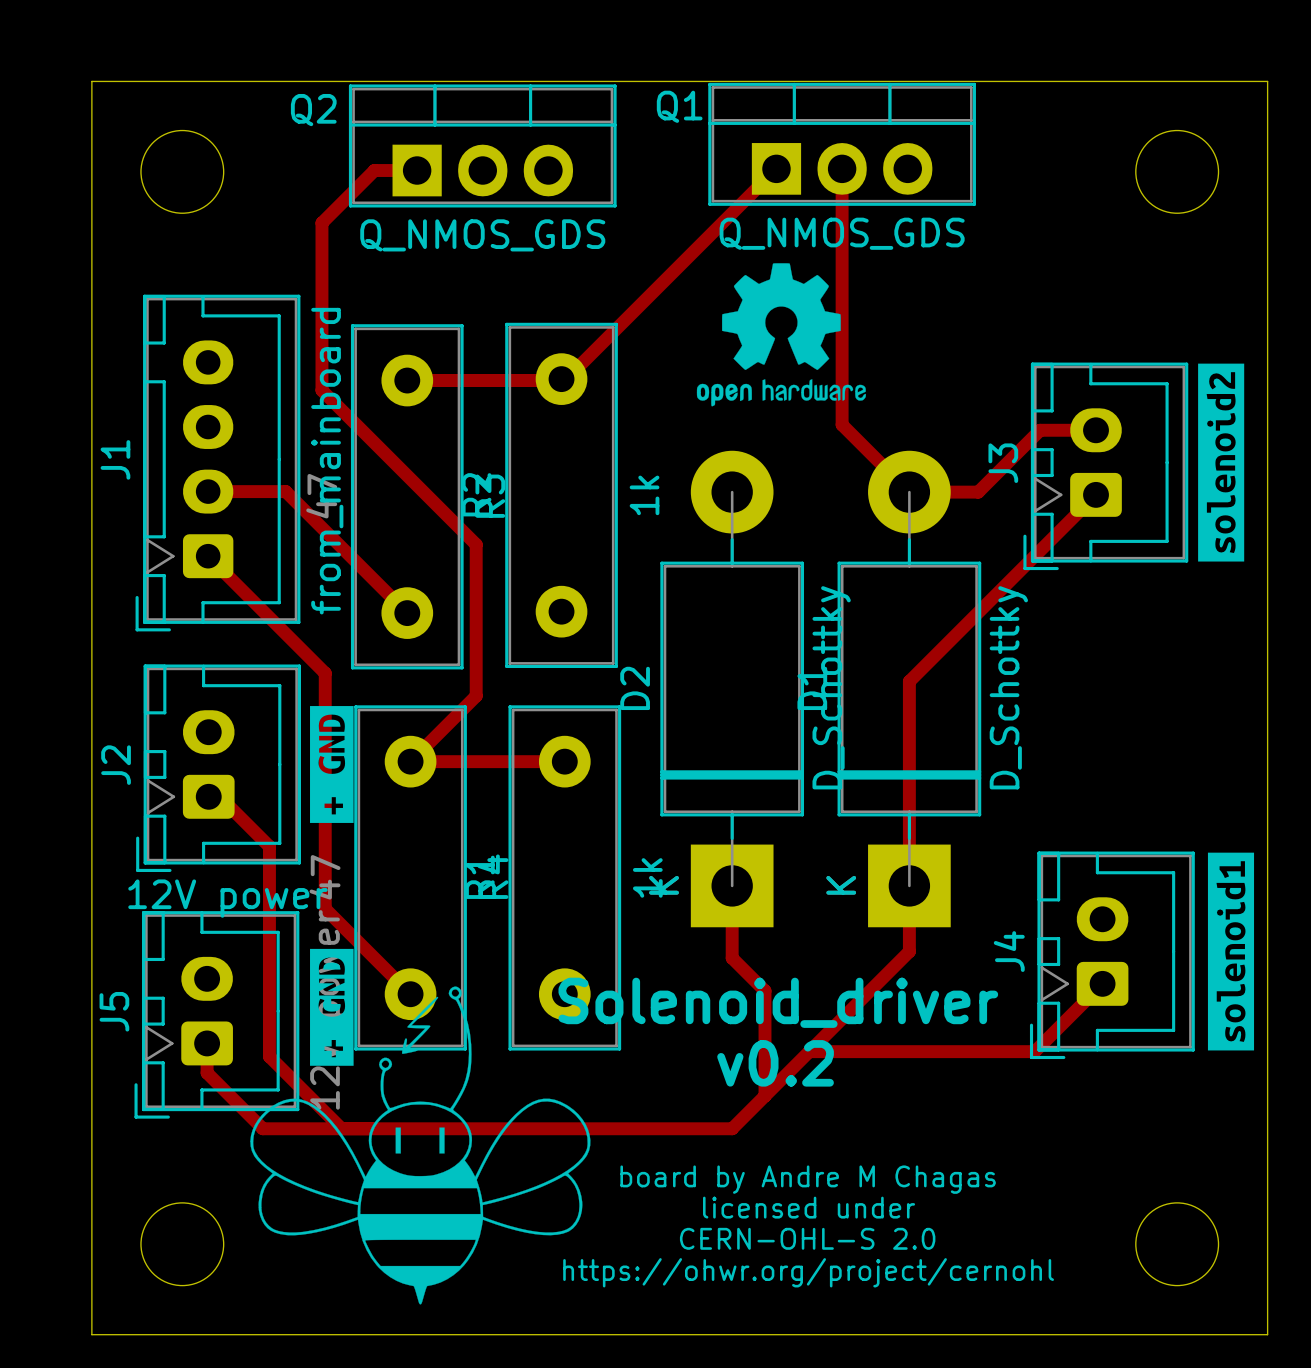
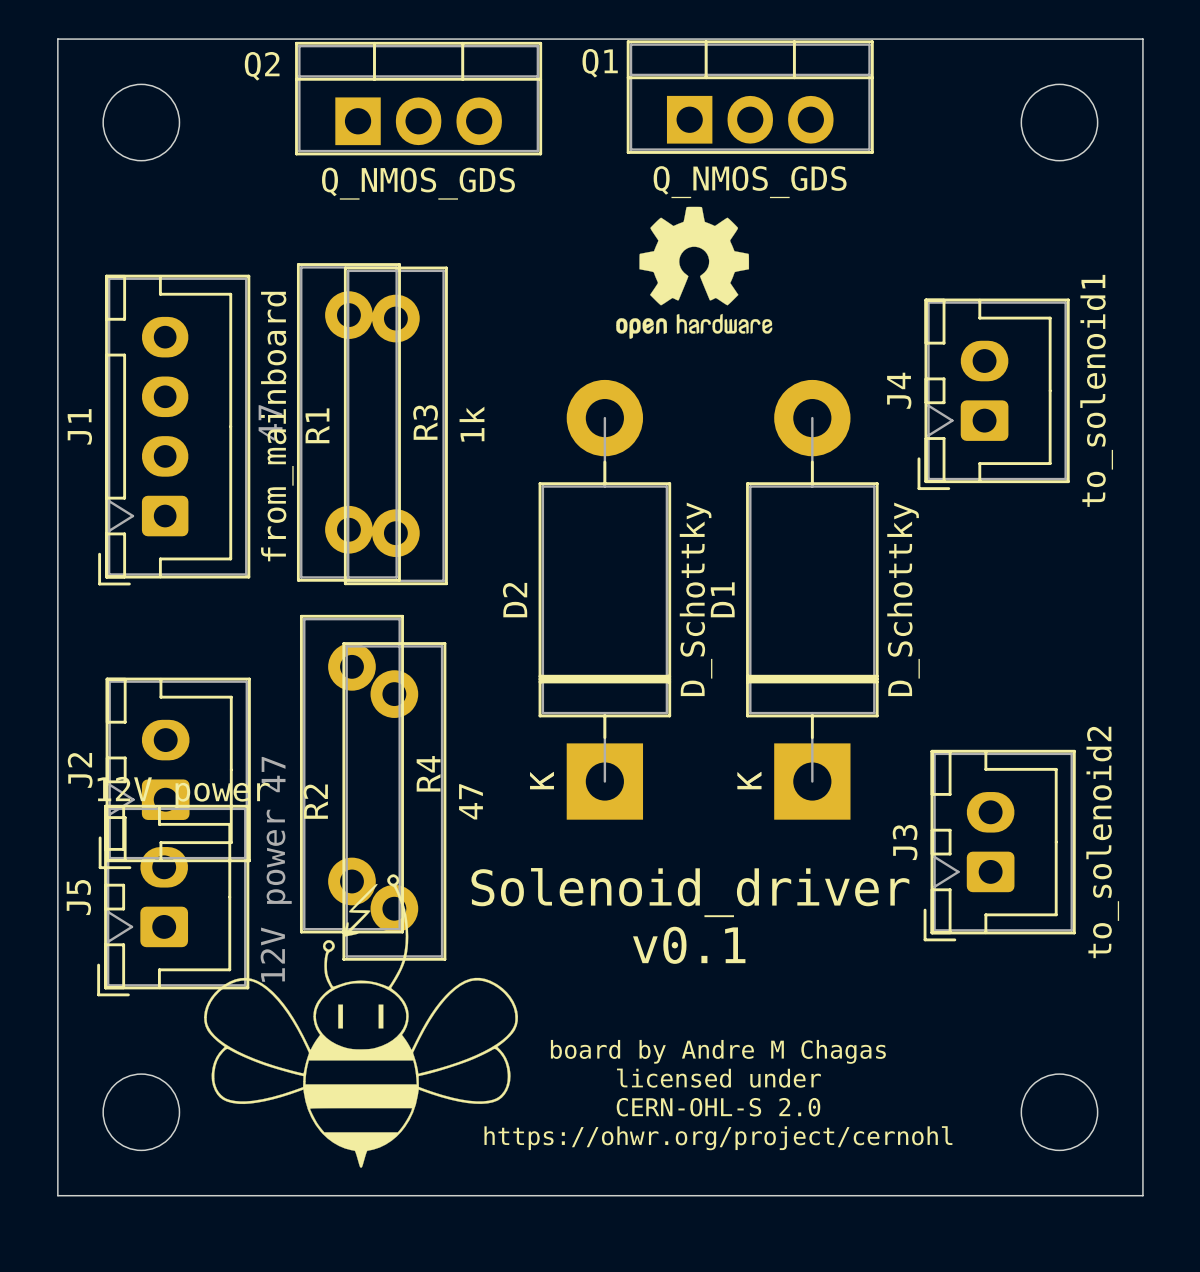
track: (776, 168) (564, 380) (407, 380) -> none
track: (842, 168) (842, 424) (909, 492) (978, 492) (1040, 430) (1096, 430) -> none
track: (417, 170) (374, 170) (321, 223) (321, 390) (476, 544) (476, 696) (410, 761) (564, 761) -> none
drawing: [1198, 363, 1245, 562] -> none
J1 position: (217, 463) -> (174, 430)
J3 name: J3 (1003, 463) -> J4 (899, 390)
J3 value: none -> to_solenoid1 (1096, 390)
track: (208, 491) (285, 491) (407, 613) -> none
track: (1096, 494) (909, 681) (909, 951) (732, 1128) (262, 1128) (207, 1072) (207, 1043) -> none
R2 position: (561, 495) -> (394, 801)
R2 value: 1k (644, 495) -> 47 (470, 801)
track: (208, 556) (325, 673) (325, 908) (410, 994) -> none
D2 position: (732, 689) -> (604, 599)
drawing: [310, 706, 354, 823] -> none
J2 position: (218, 768) -> (174, 773)
track: (208, 796) (219, 796) (269, 846) (269, 1056) (341, 1128) -> none
drawing: [1207, 852, 1255, 1051] -> none
R1 position: (564, 877) -> (395, 425)
track: (732, 885) (732, 958) (764, 990) (764, 1095) -> none
drawing: [310, 948, 354, 1066] -> none
J4 name: J4 (1009, 951) -> J3 (905, 842)
J4 value: none -> to_solenoid2 (1102, 842)
track: (1102, 983) (1034, 1051) (809, 1051) -> none
text: v0.2 (775, 1063) -> v0.1 (689, 945)

